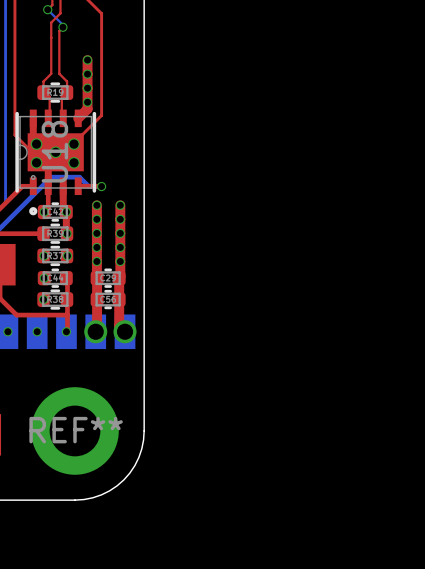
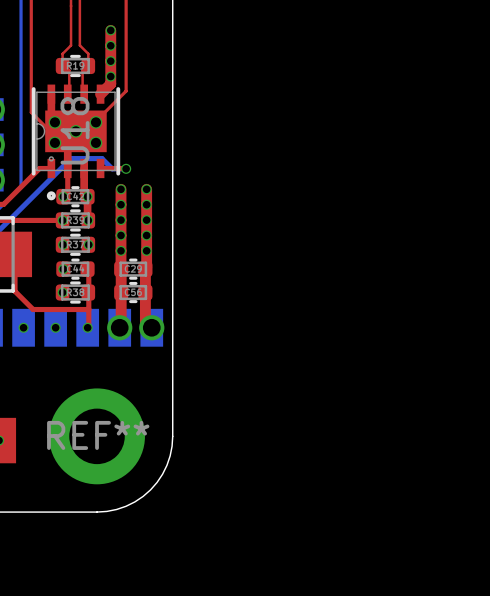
via: none -> (62, 220)

